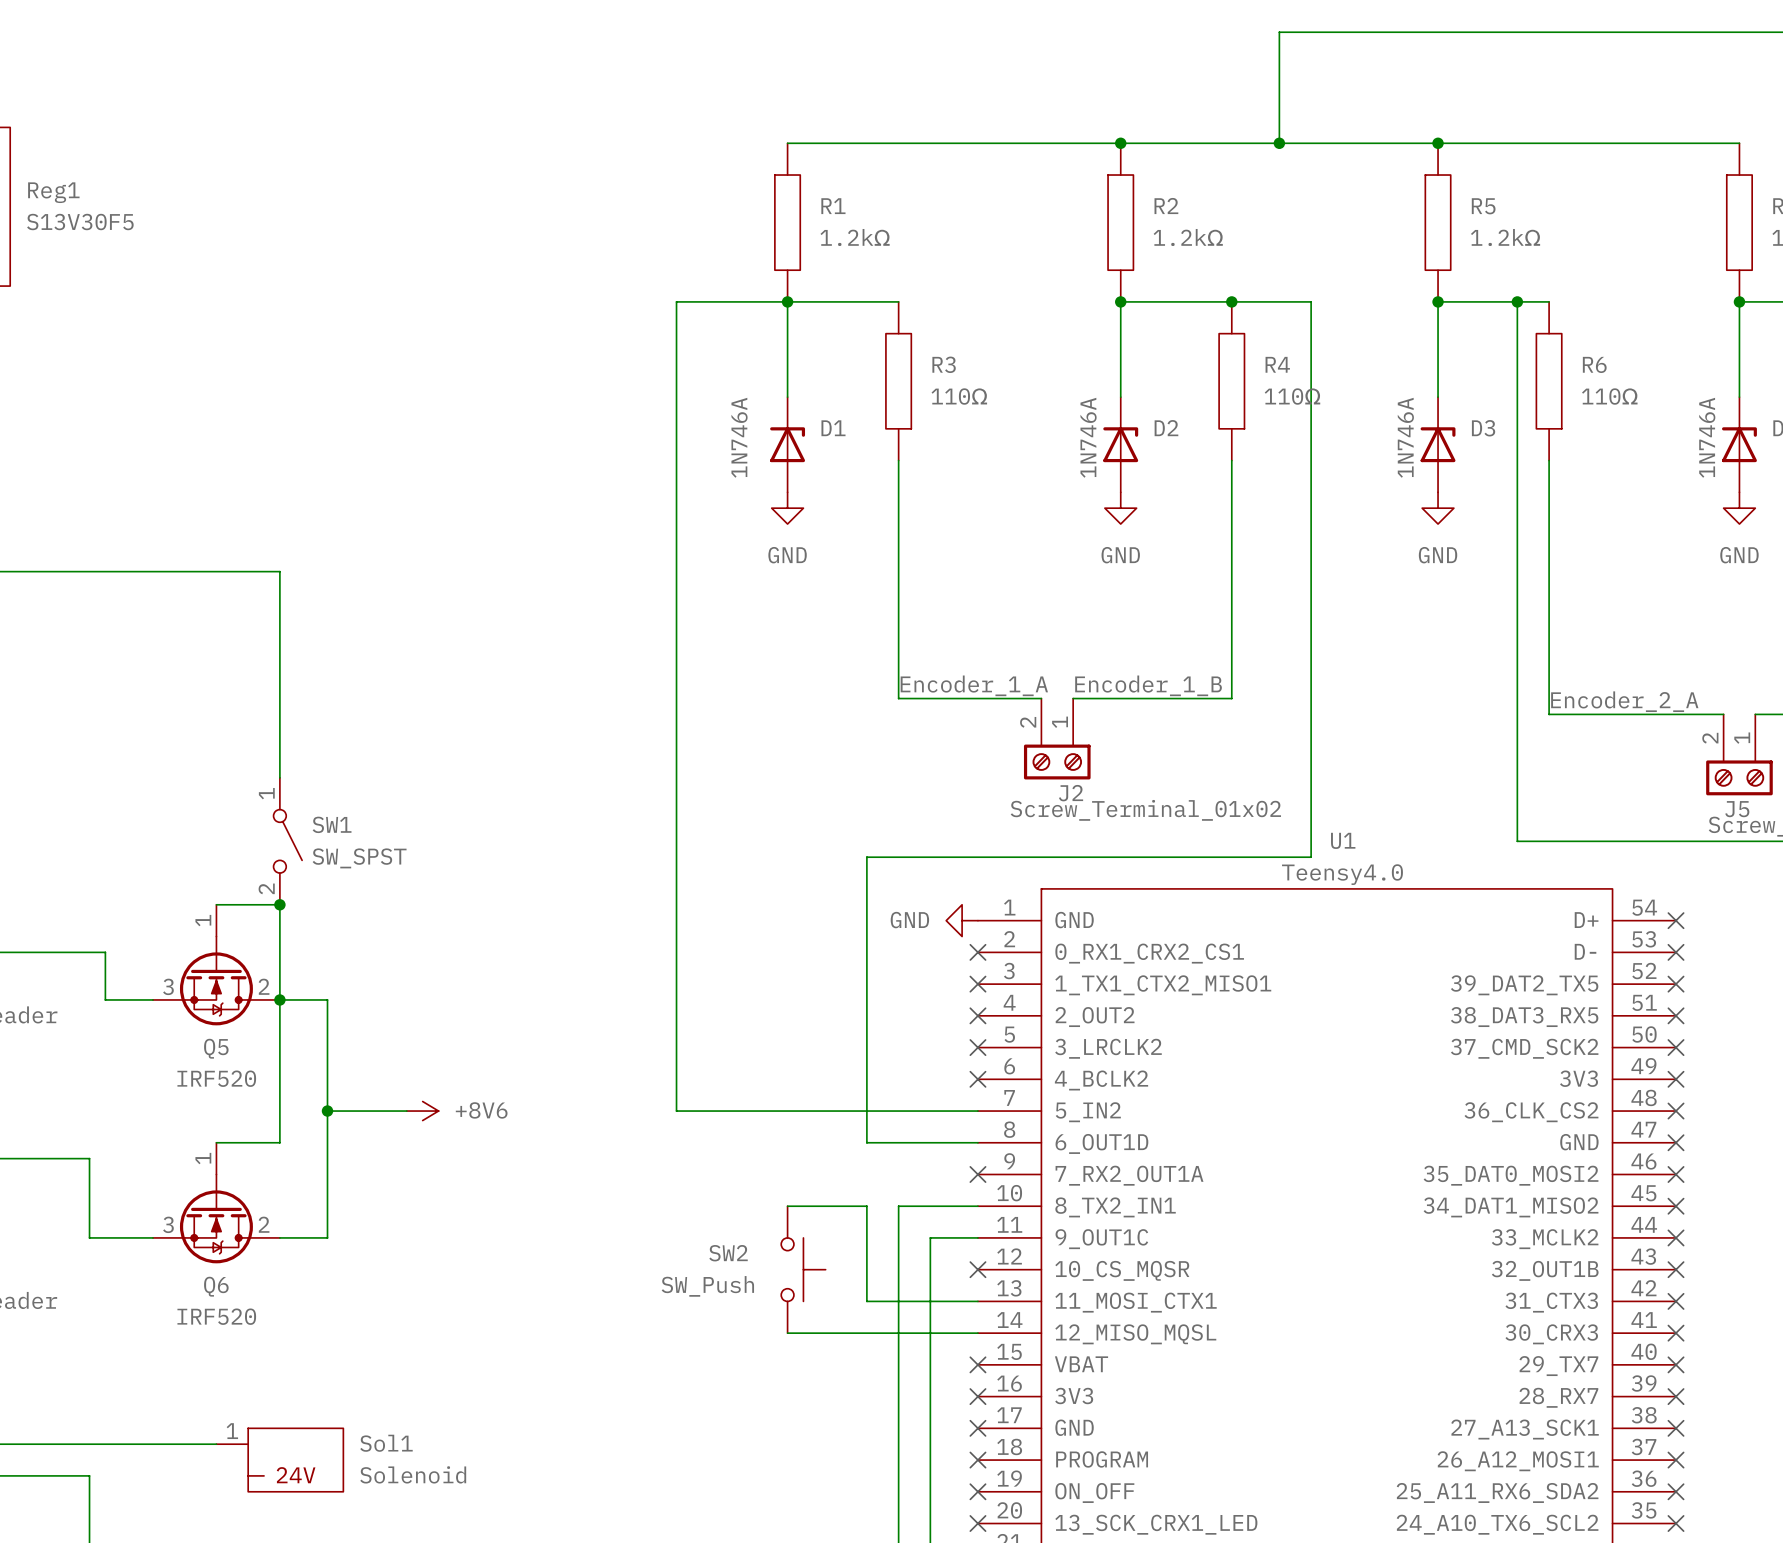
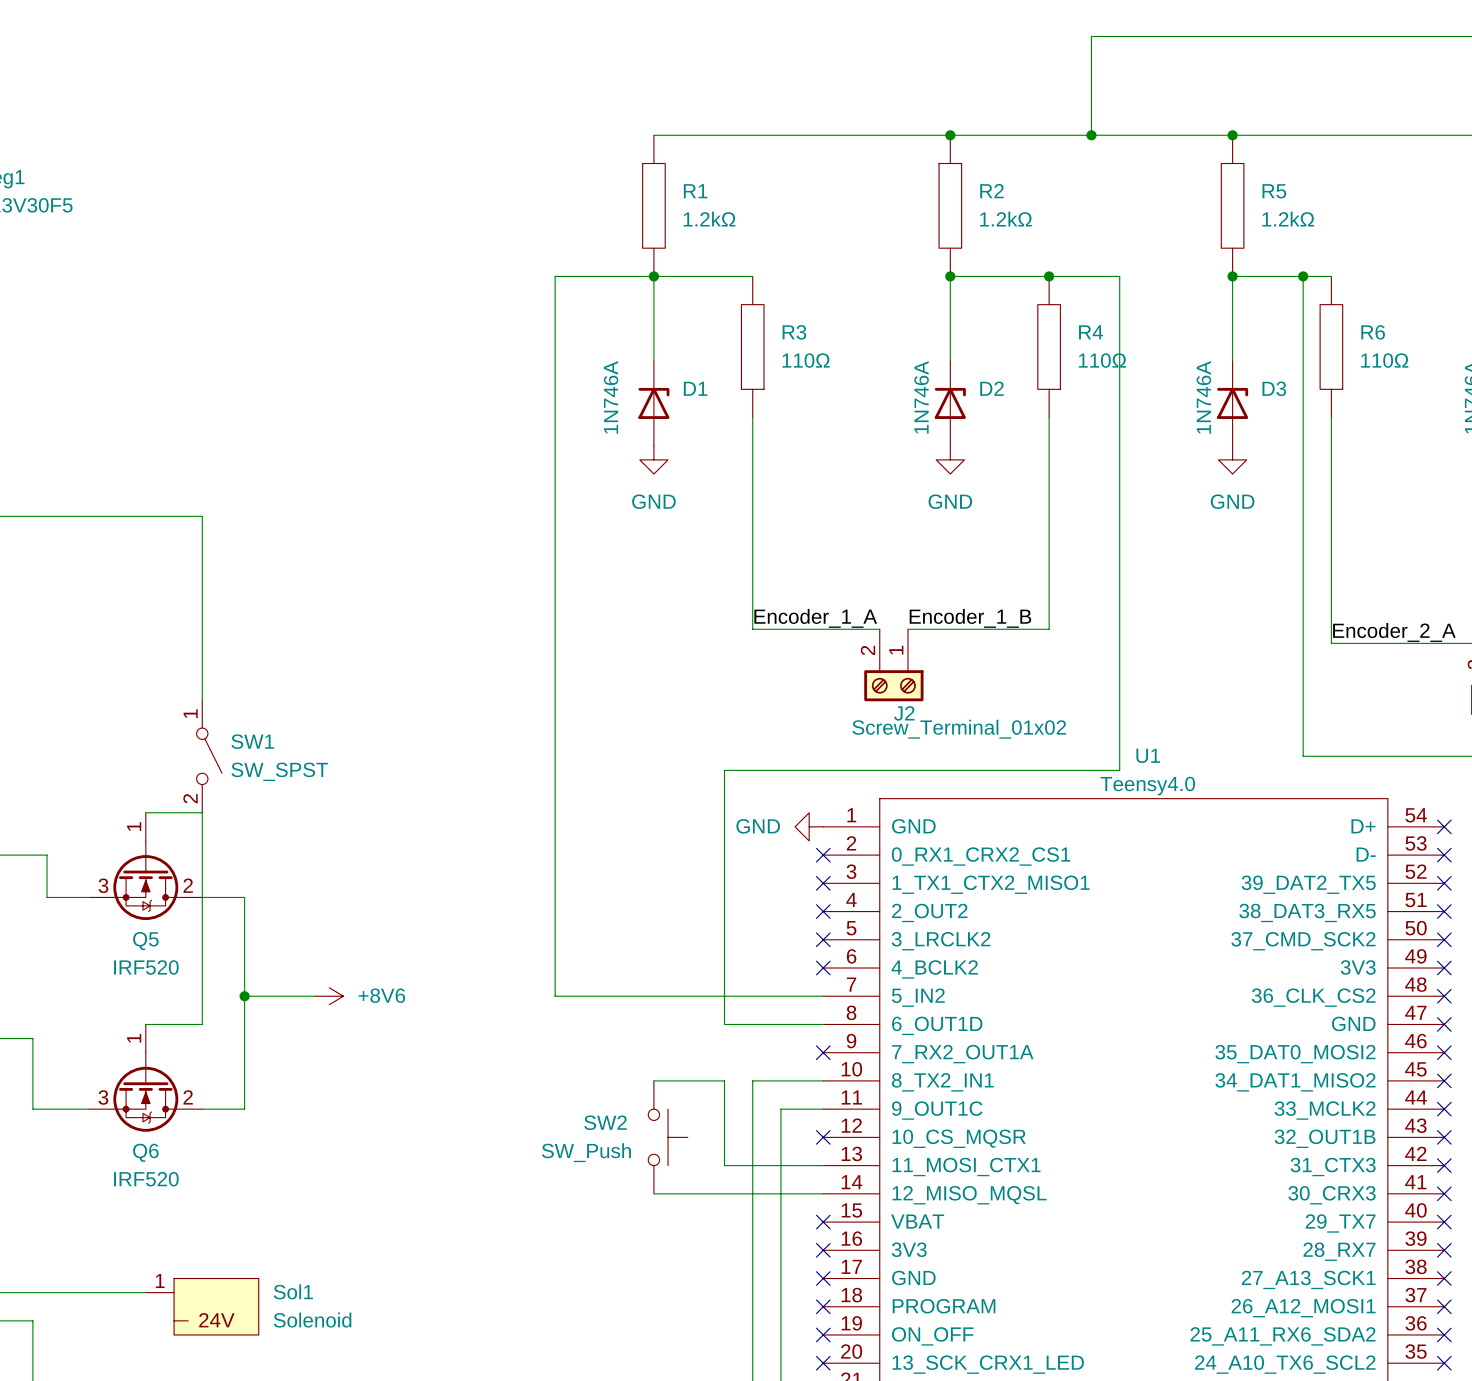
junction: (279, 904) -> none
junction: (279, 999) -> none

